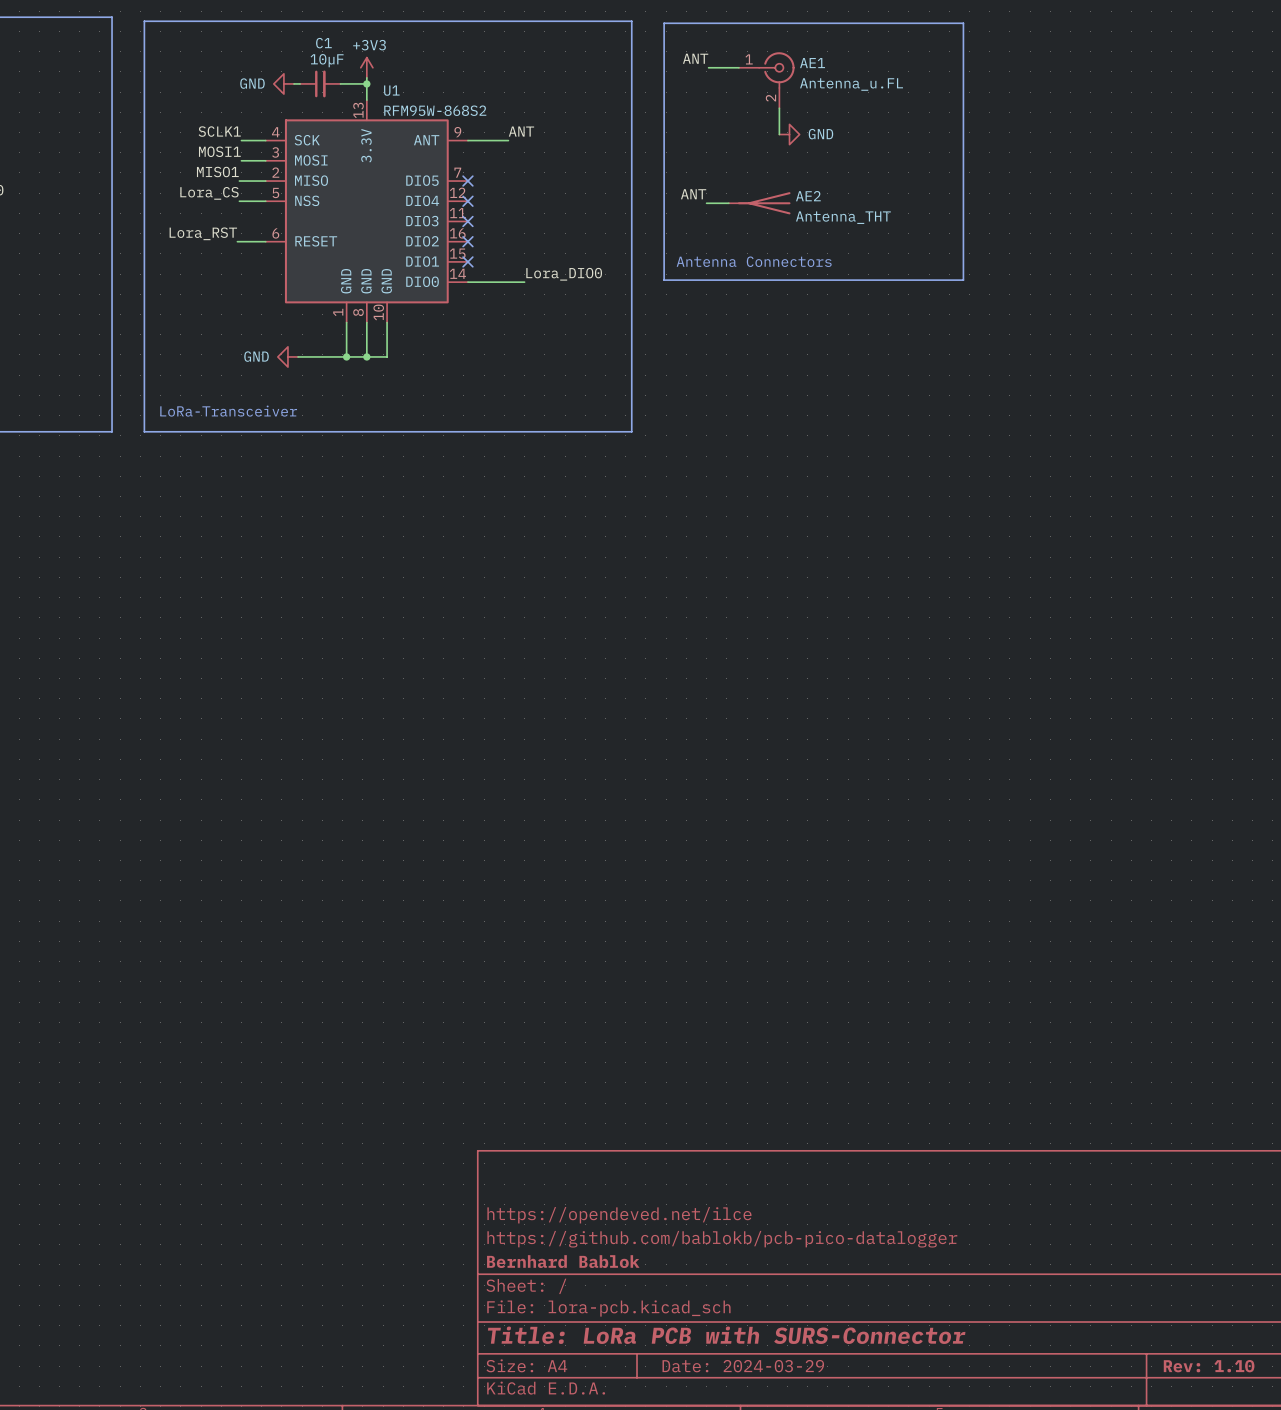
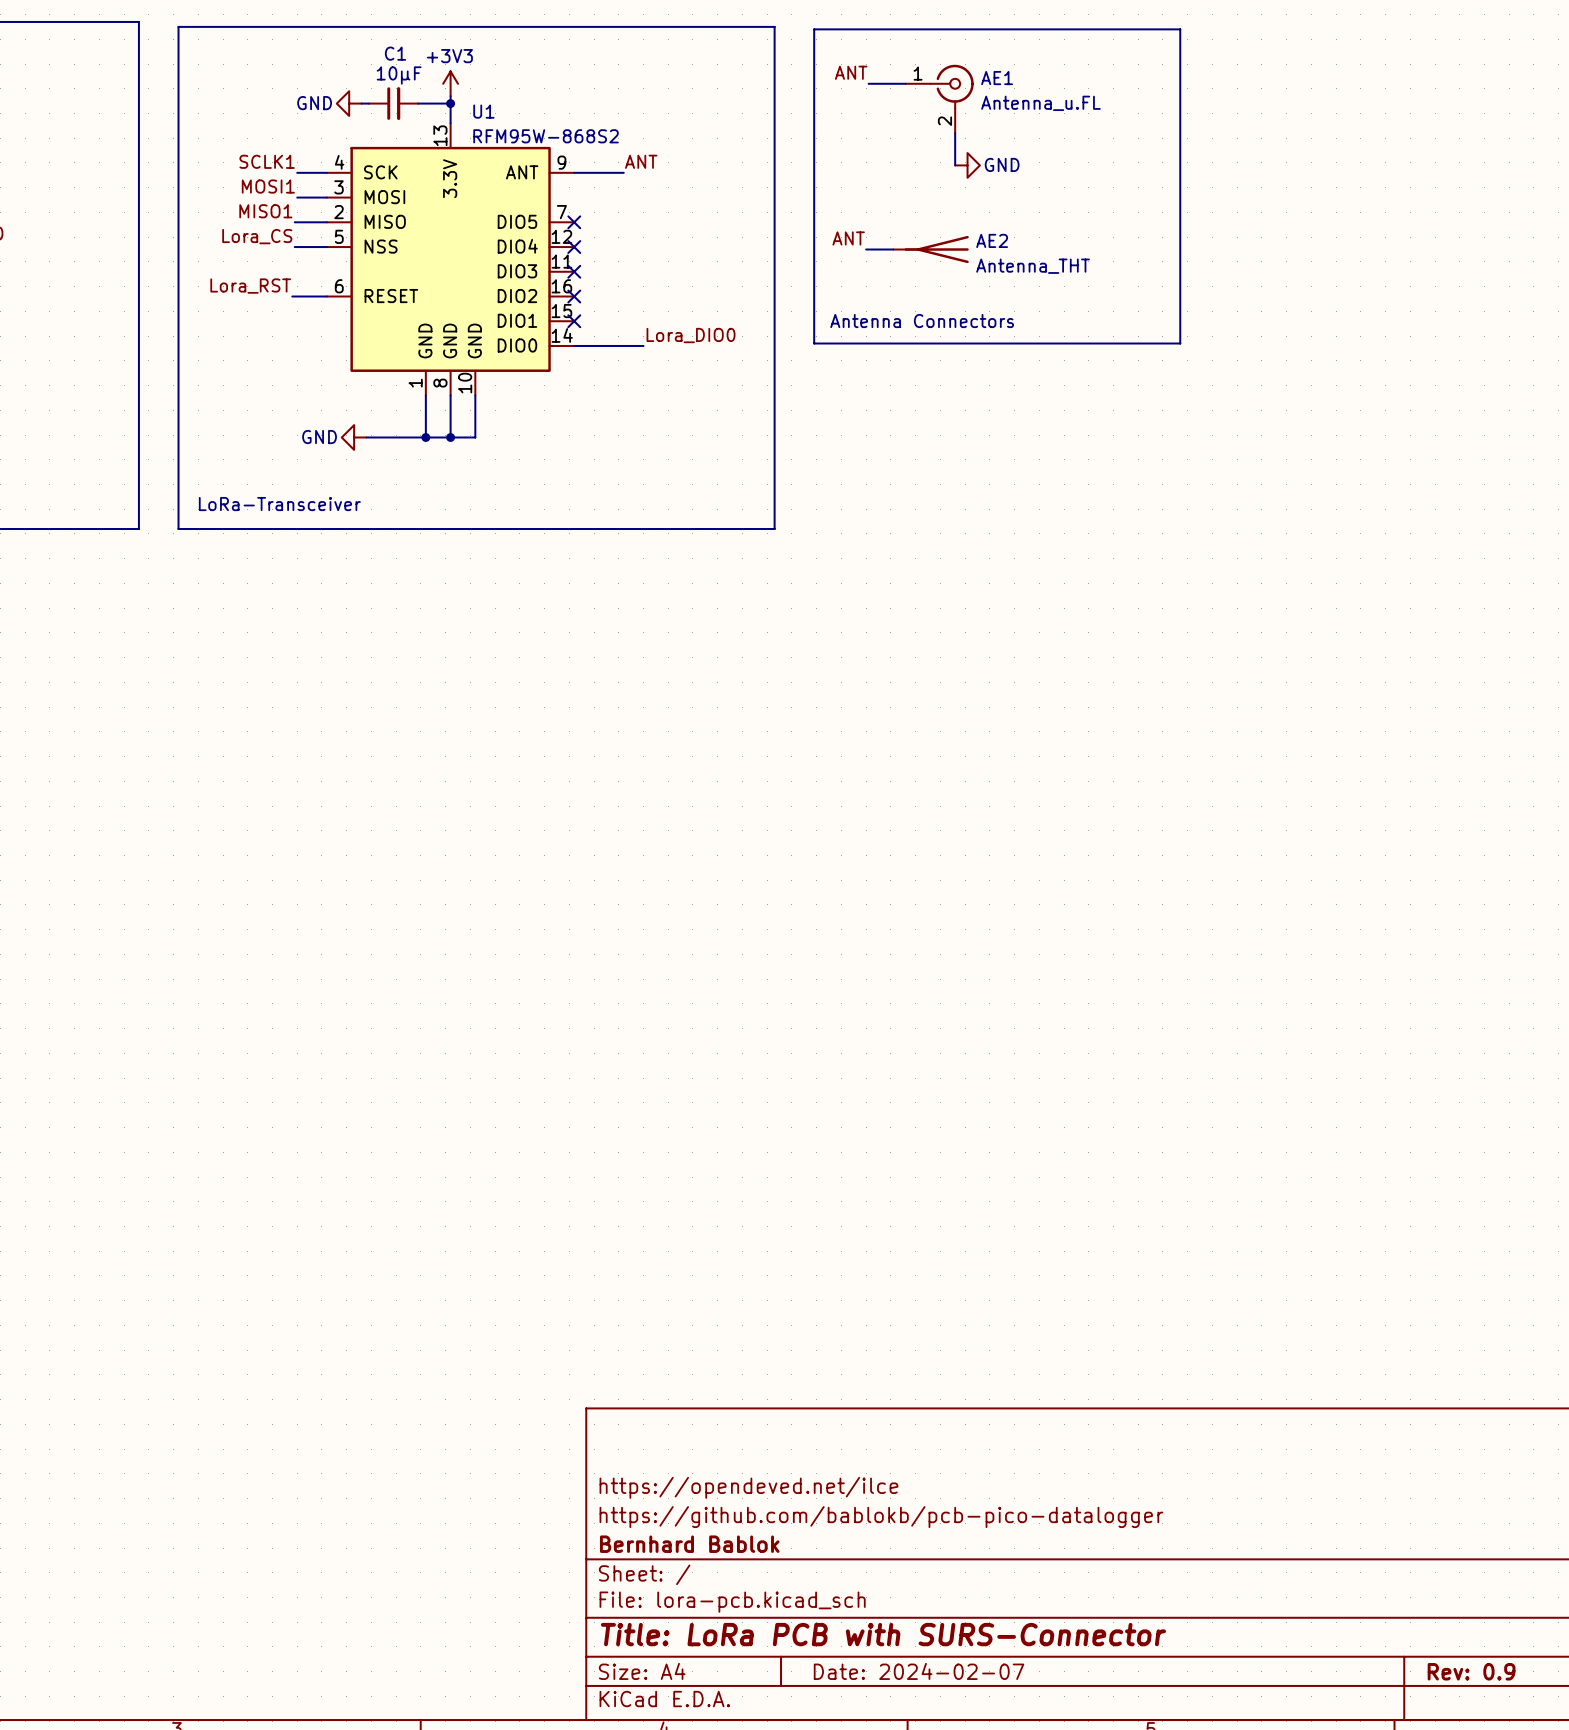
title block: Date: 2024-03-29 (743, 1366) -> Date: 2024-02-07 (919, 1671)
title block: Rev: 1.10 (1209, 1366) -> Rev: 0.9 (1471, 1671)

